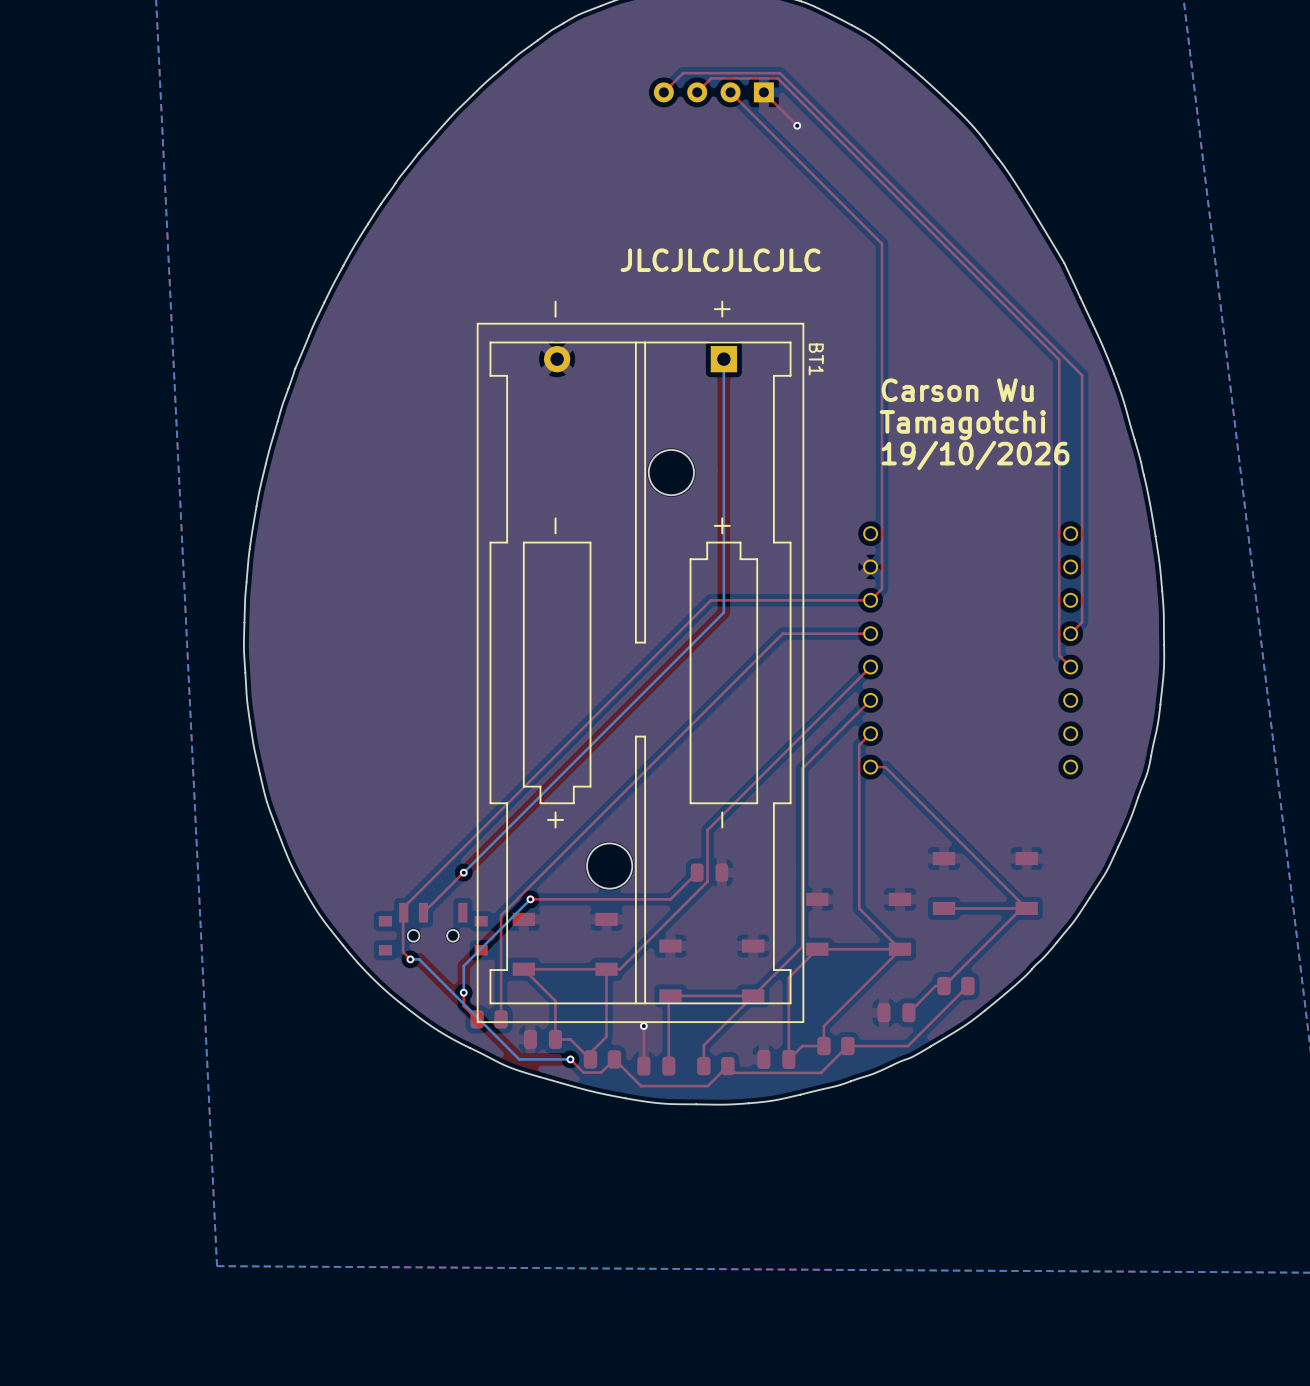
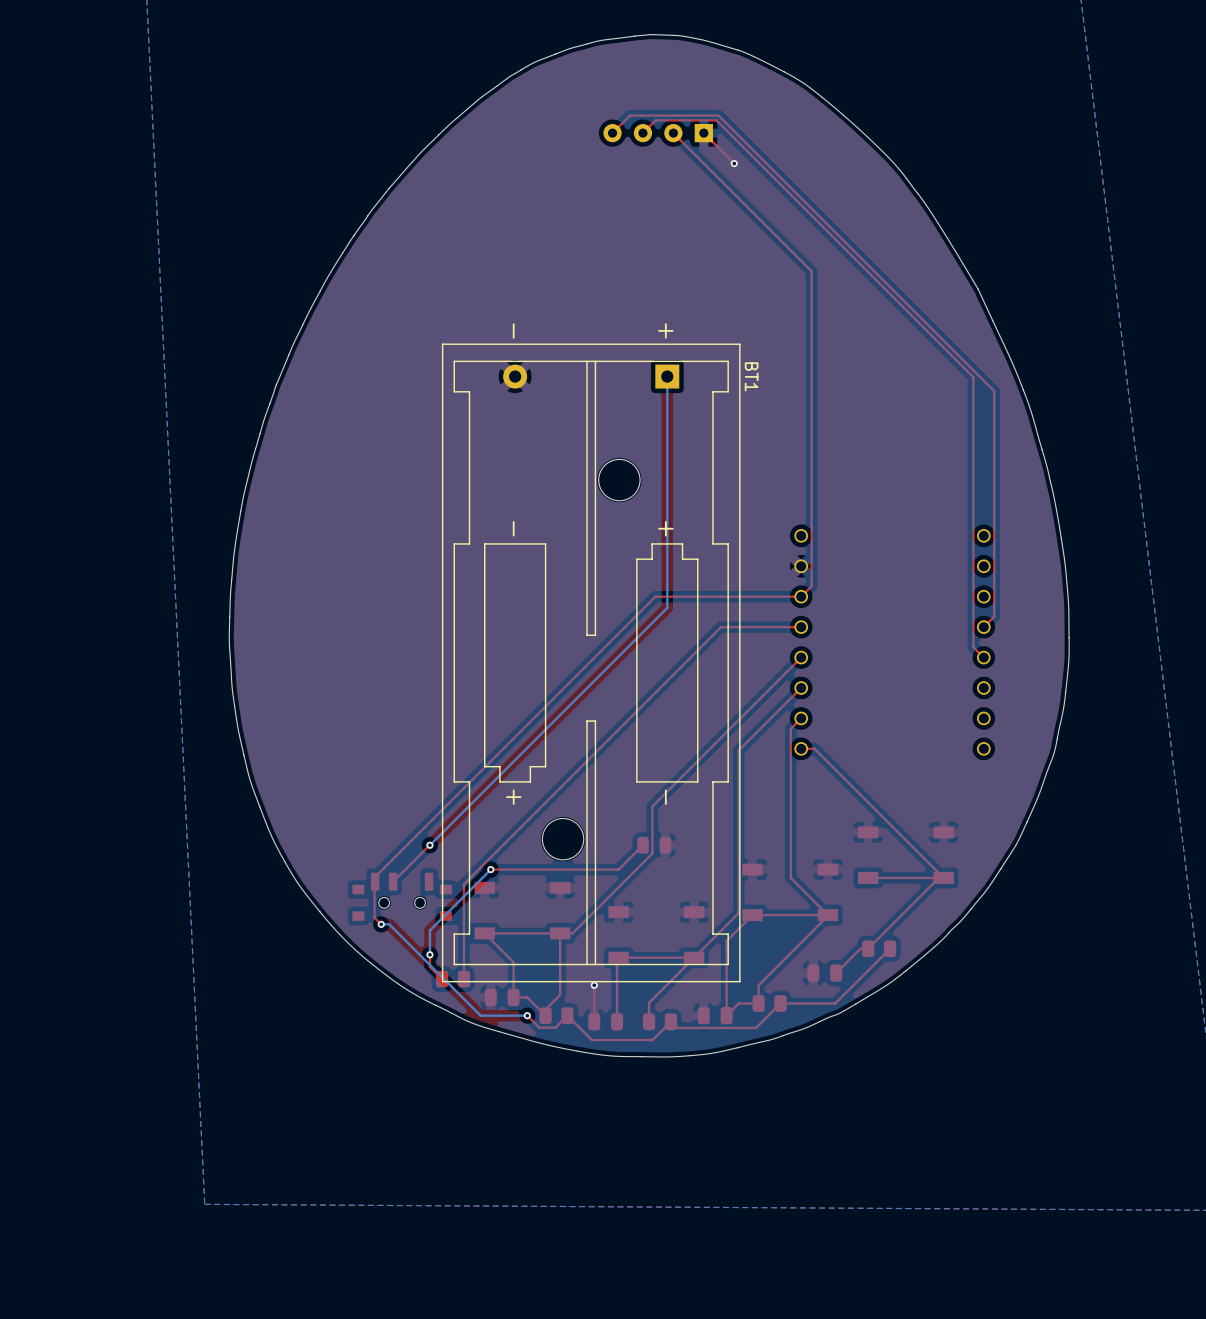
text: JLCJLCJLCJLC (720, 260) -> none
text: Carson Wu (957, 390) -> none
text: Tamagotchi (962, 425) -> none
text: 19/10/2026 (975, 455) -> none

